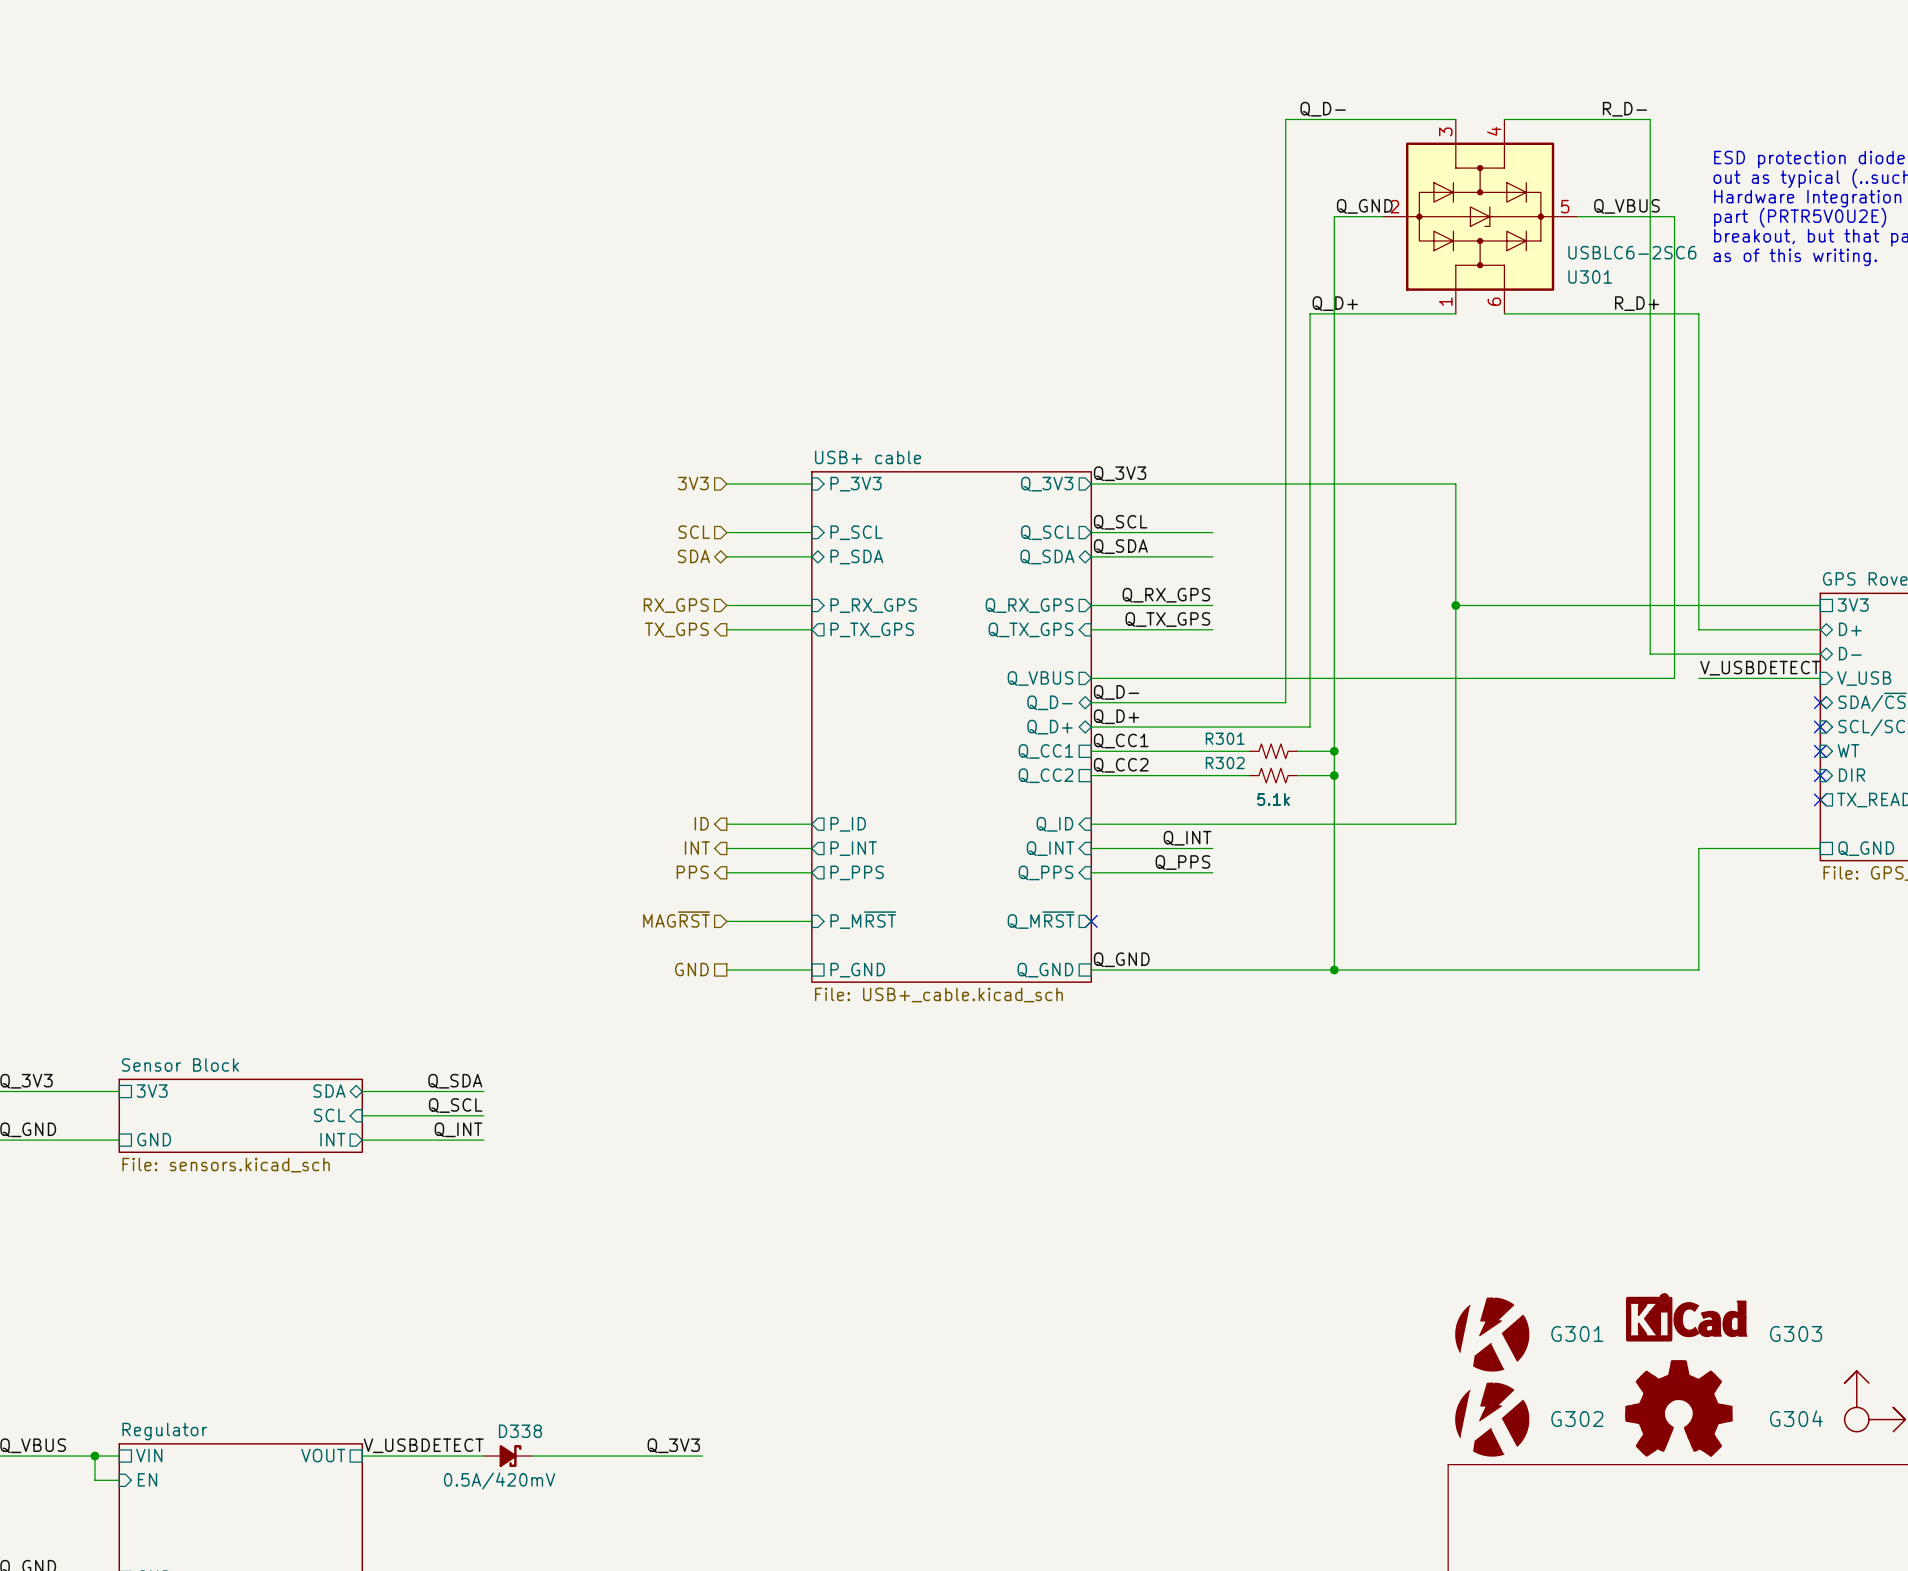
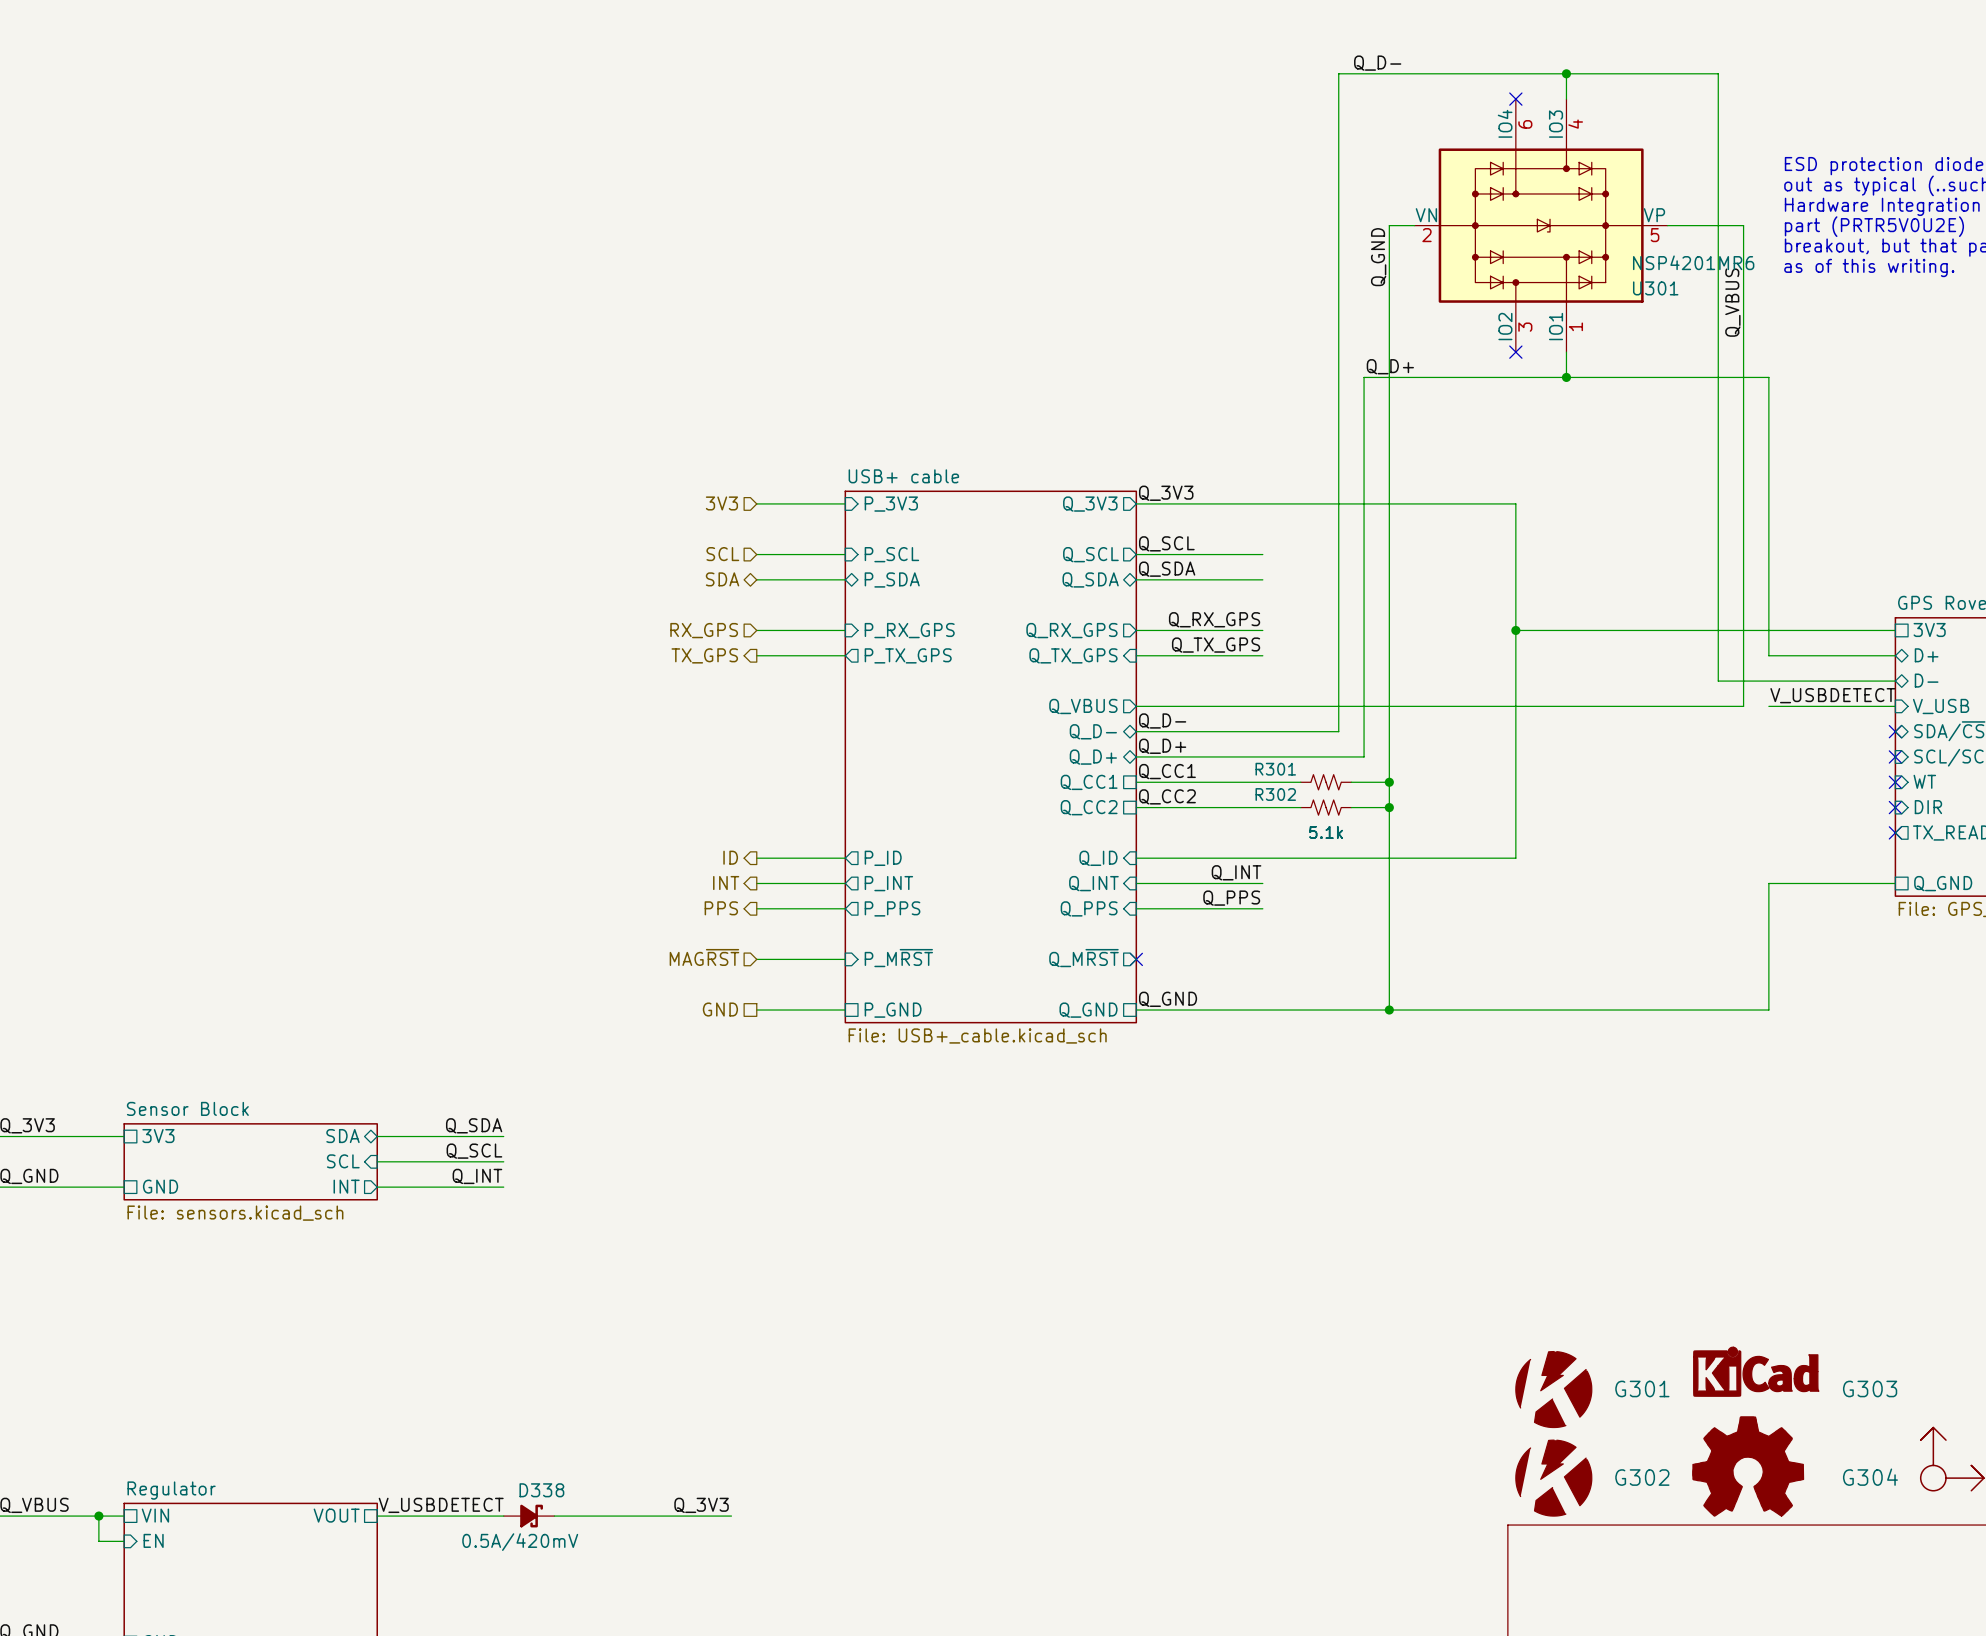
wire: none -> (1566, 73) (1566, 99)
junction: none -> (1566, 73)
no-connect mark: none -> (1515, 99)
label position: Q_D- (1323, 109) -> Q_D- (1377, 63)
label: R_D- (1624, 109) -> none
wire: (1285, 119) (1455, 119) -> (1338, 124) (1338, 73) (1718, 73) (1718, 124)
U301 symbol: [1382, 119, 1578, 314] -> [1414, 99, 1668, 353]
wire: (1504, 119) (1650, 119) -> none
label rotation: 0° (1364, 206) -> 90° counterclockwise (1378, 257)
label rotation: 0° (1626, 206) -> 90° counterclockwise (1732, 302)
label position: Q_VBUS (1626, 206) -> Q_VBUS (1732, 302)
U301 value: USBLC6-2SC6 (1632, 252) -> NSP4201MR6 (1693, 262)
label position: Q_D+ (1335, 303) -> Q_D+ (1390, 366)
label: R_D+ (1637, 303) -> none
wire: (1455, 313) (1310, 313) (1310, 362) -> none
wire: (1504, 313) (1698, 313) (1698, 362) -> (1364, 377) (1768, 377)
no-connect mark: none -> (1515, 352)
wire: none -> (1566, 352) (1566, 377)
junction: none -> (1566, 377)

